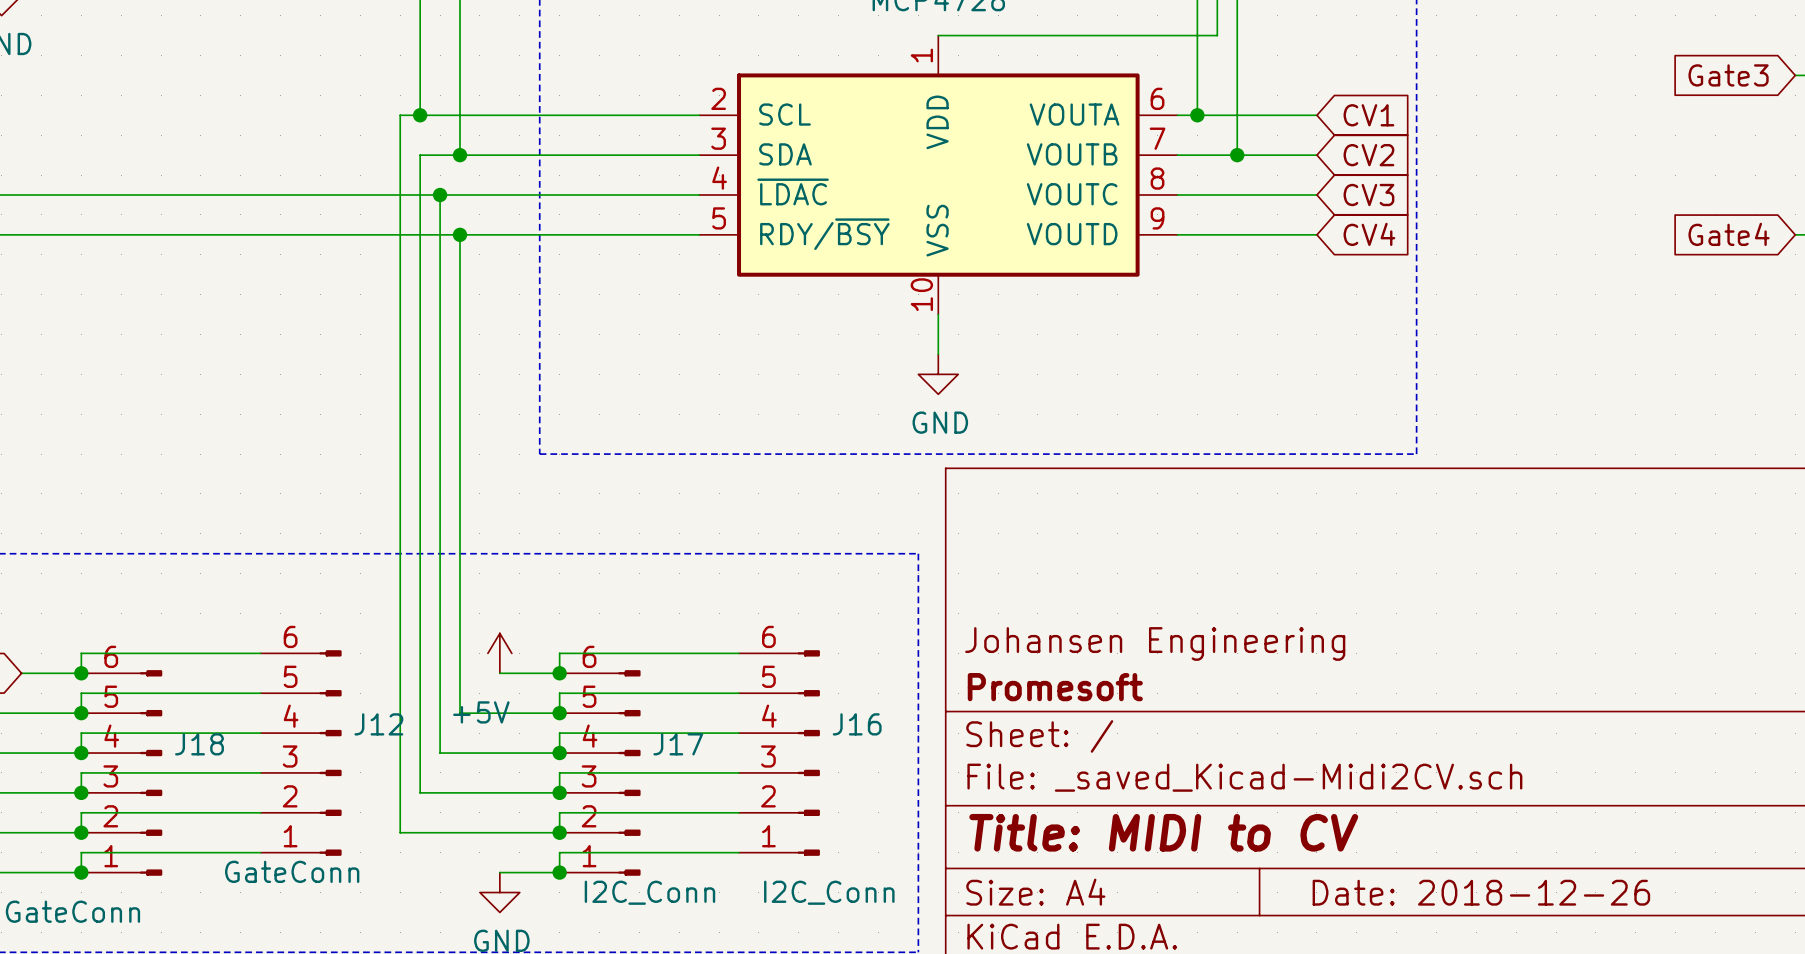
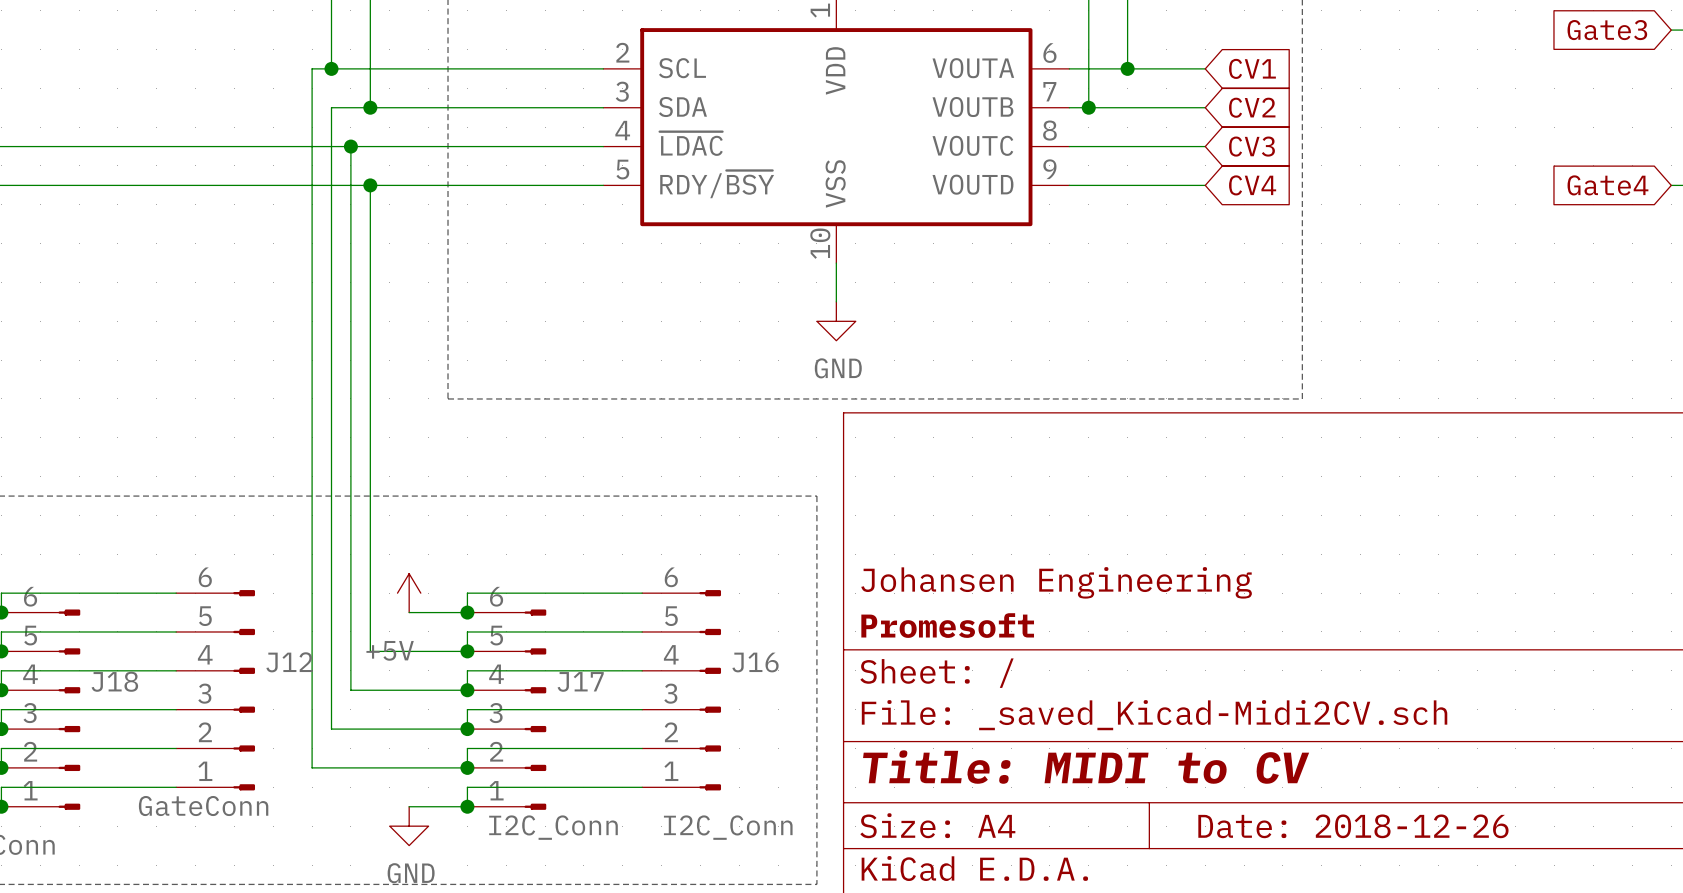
junction: (1197, 115) -> none
wire: (1237, 115) (1237, 155) -> (1088, 68) (1088, 107)
junction: none -> (1127, 68)
junction: none -> (1088, 107)
junction: (1237, 155) -> none

